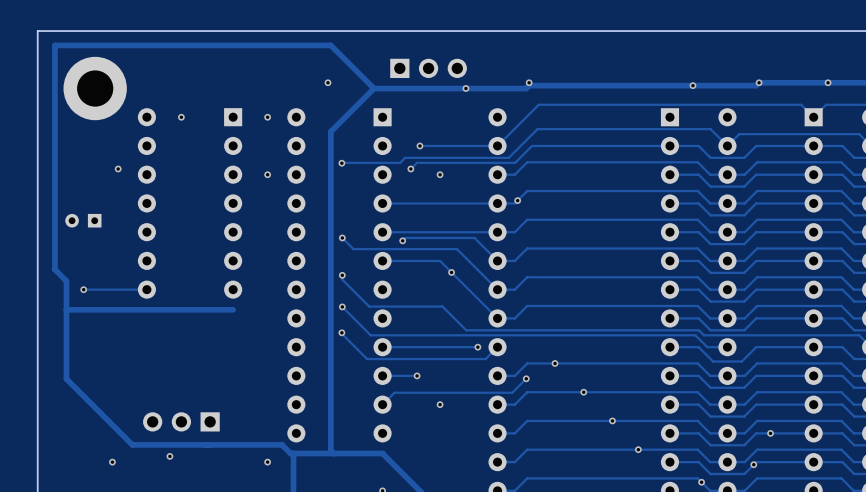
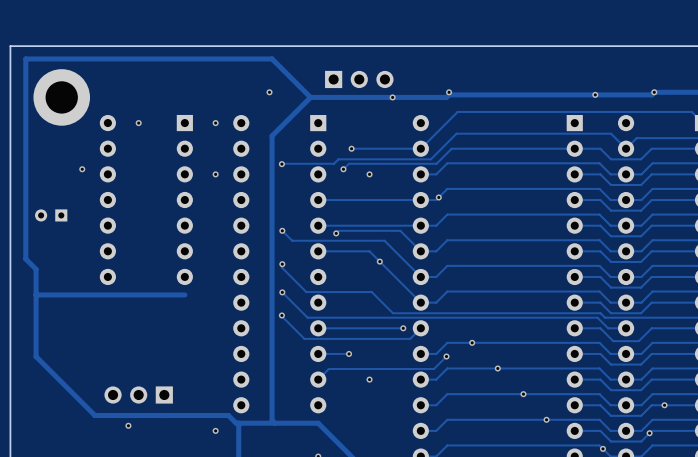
via: (83, 289) -> none
track: (146, 289) (83, 289) -> none
via: (112, 462) -> none

